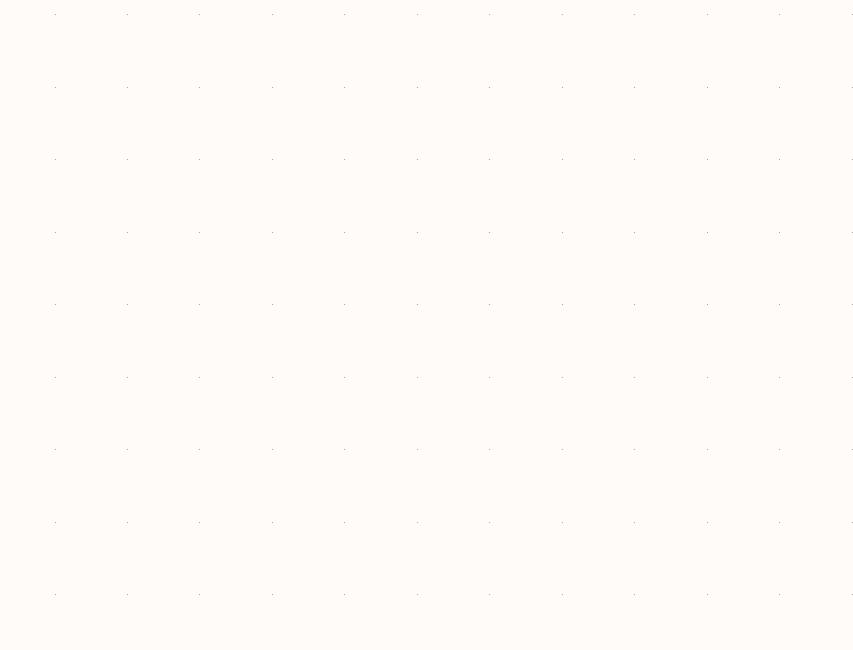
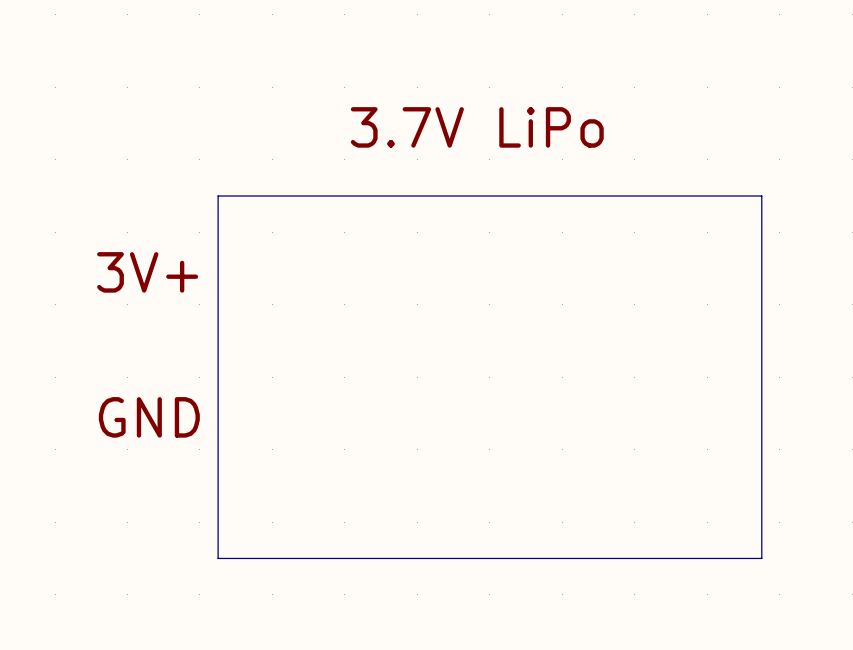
label: none -> 3.7V LiPo (477, 127)
line: none -> (218, 196) (761, 196) (761, 558) (218, 558) (218, 196)
label: none -> 3V+ (147, 272)
label: none -> GND (149, 417)

